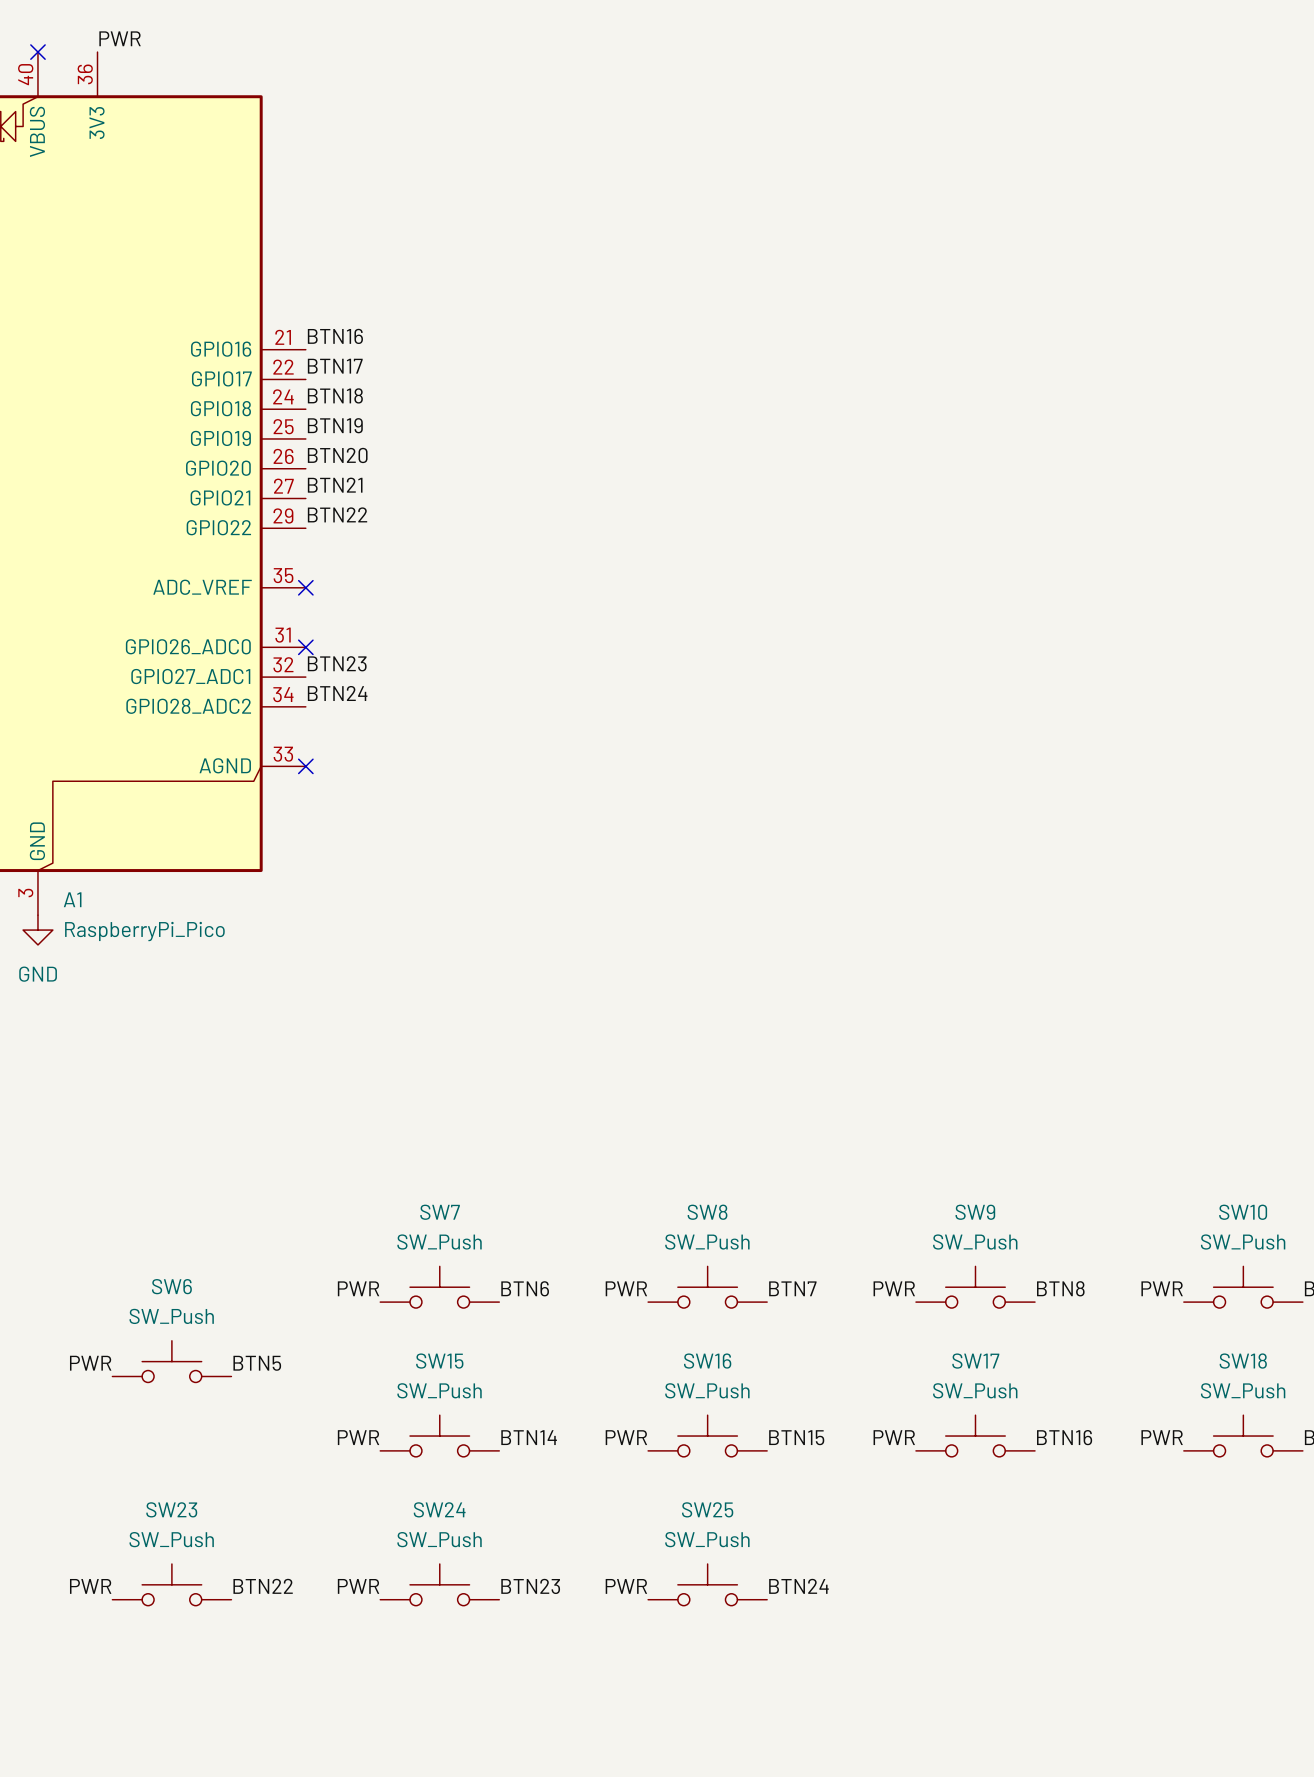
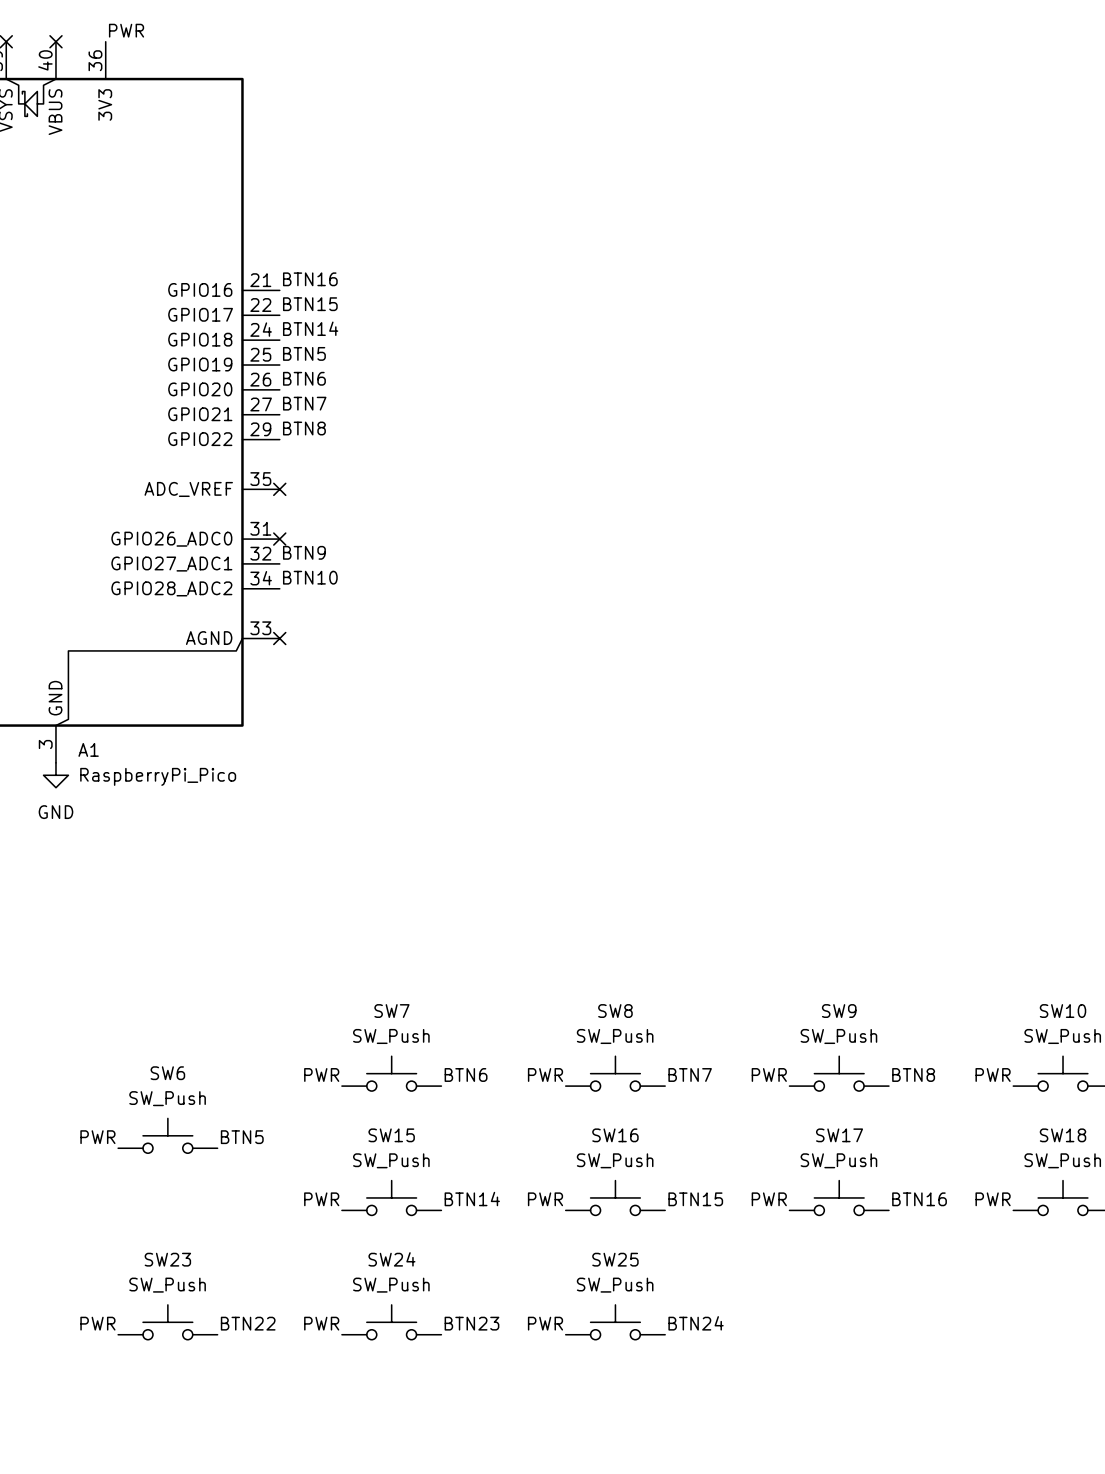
label: BTN17 (335, 366) -> BTN15 (310, 304)
label: BTN18 (335, 395) -> BTN14 (310, 328)
label: BTN19 (335, 425) -> BTN5 (304, 353)
label: BTN20 (337, 455) -> BTN6 (304, 378)
label: BTN21 (335, 485) -> BTN7 (304, 403)
label: BTN22 (337, 514) -> BTN8 (304, 428)
label: BTN23 (337, 663) -> BTN9 (304, 552)
label: BTN24 (337, 693) -> BTN10 (310, 577)

